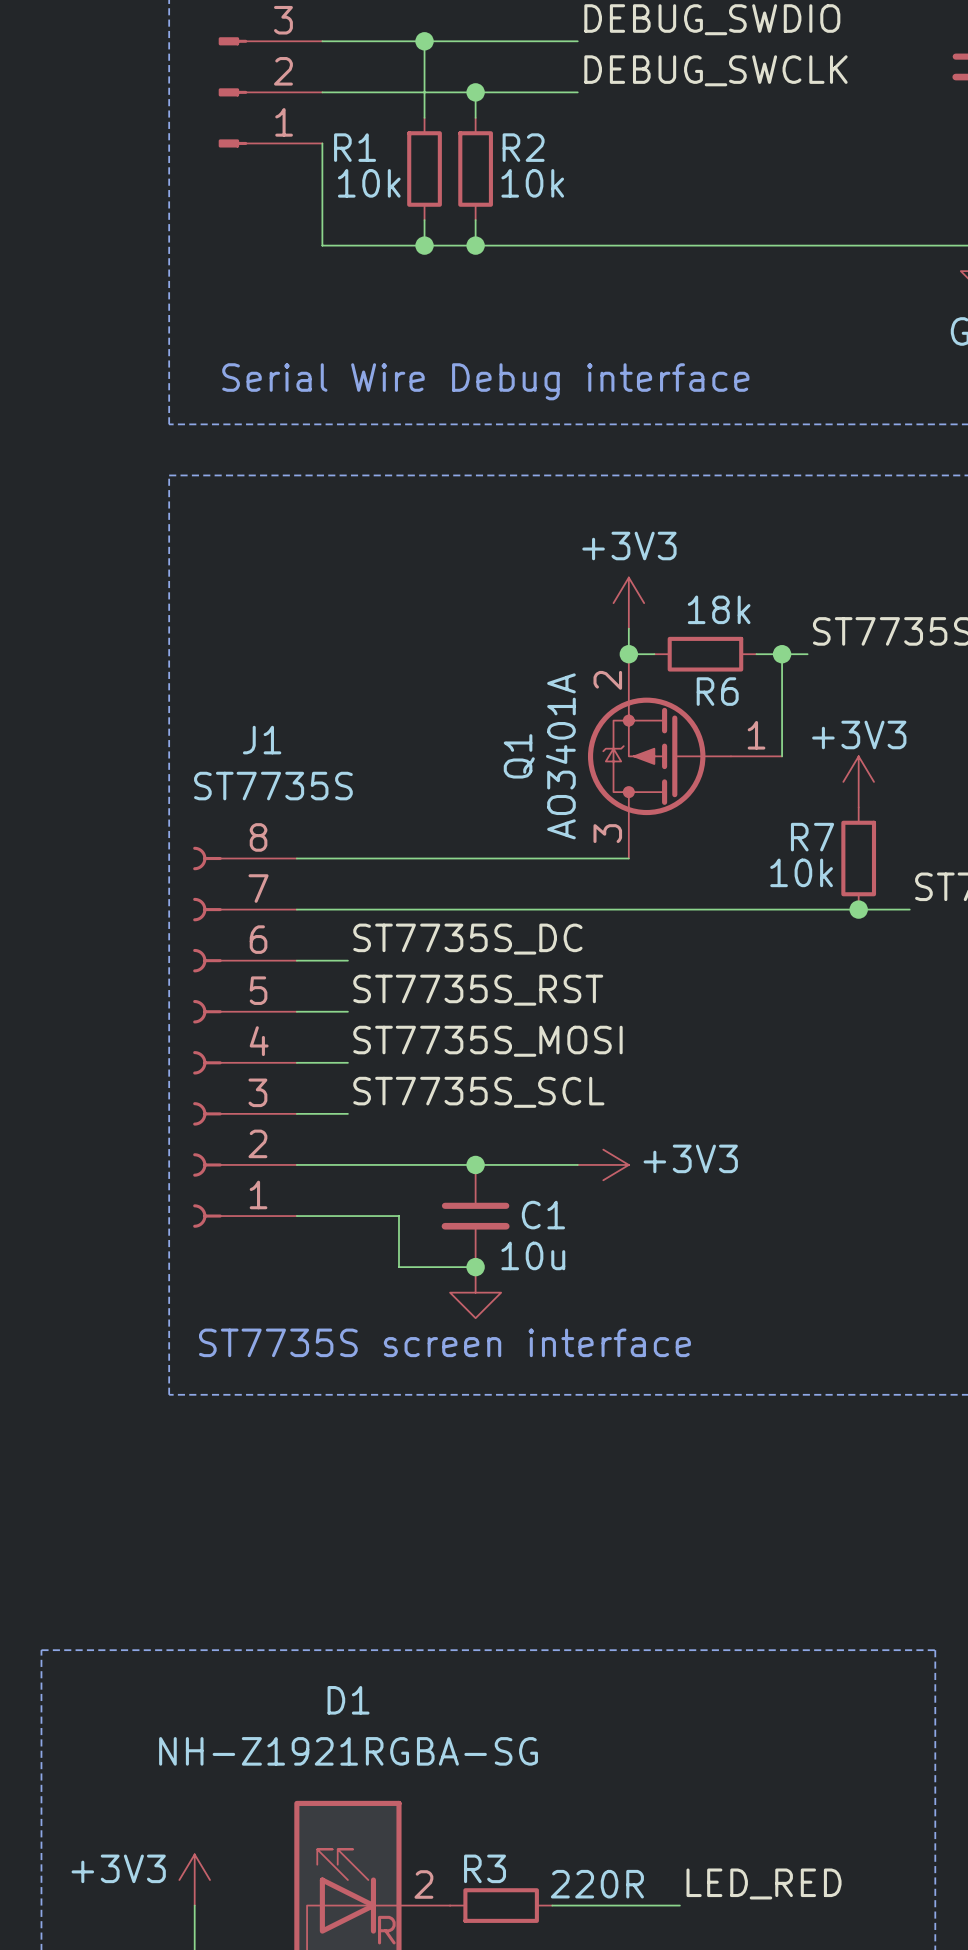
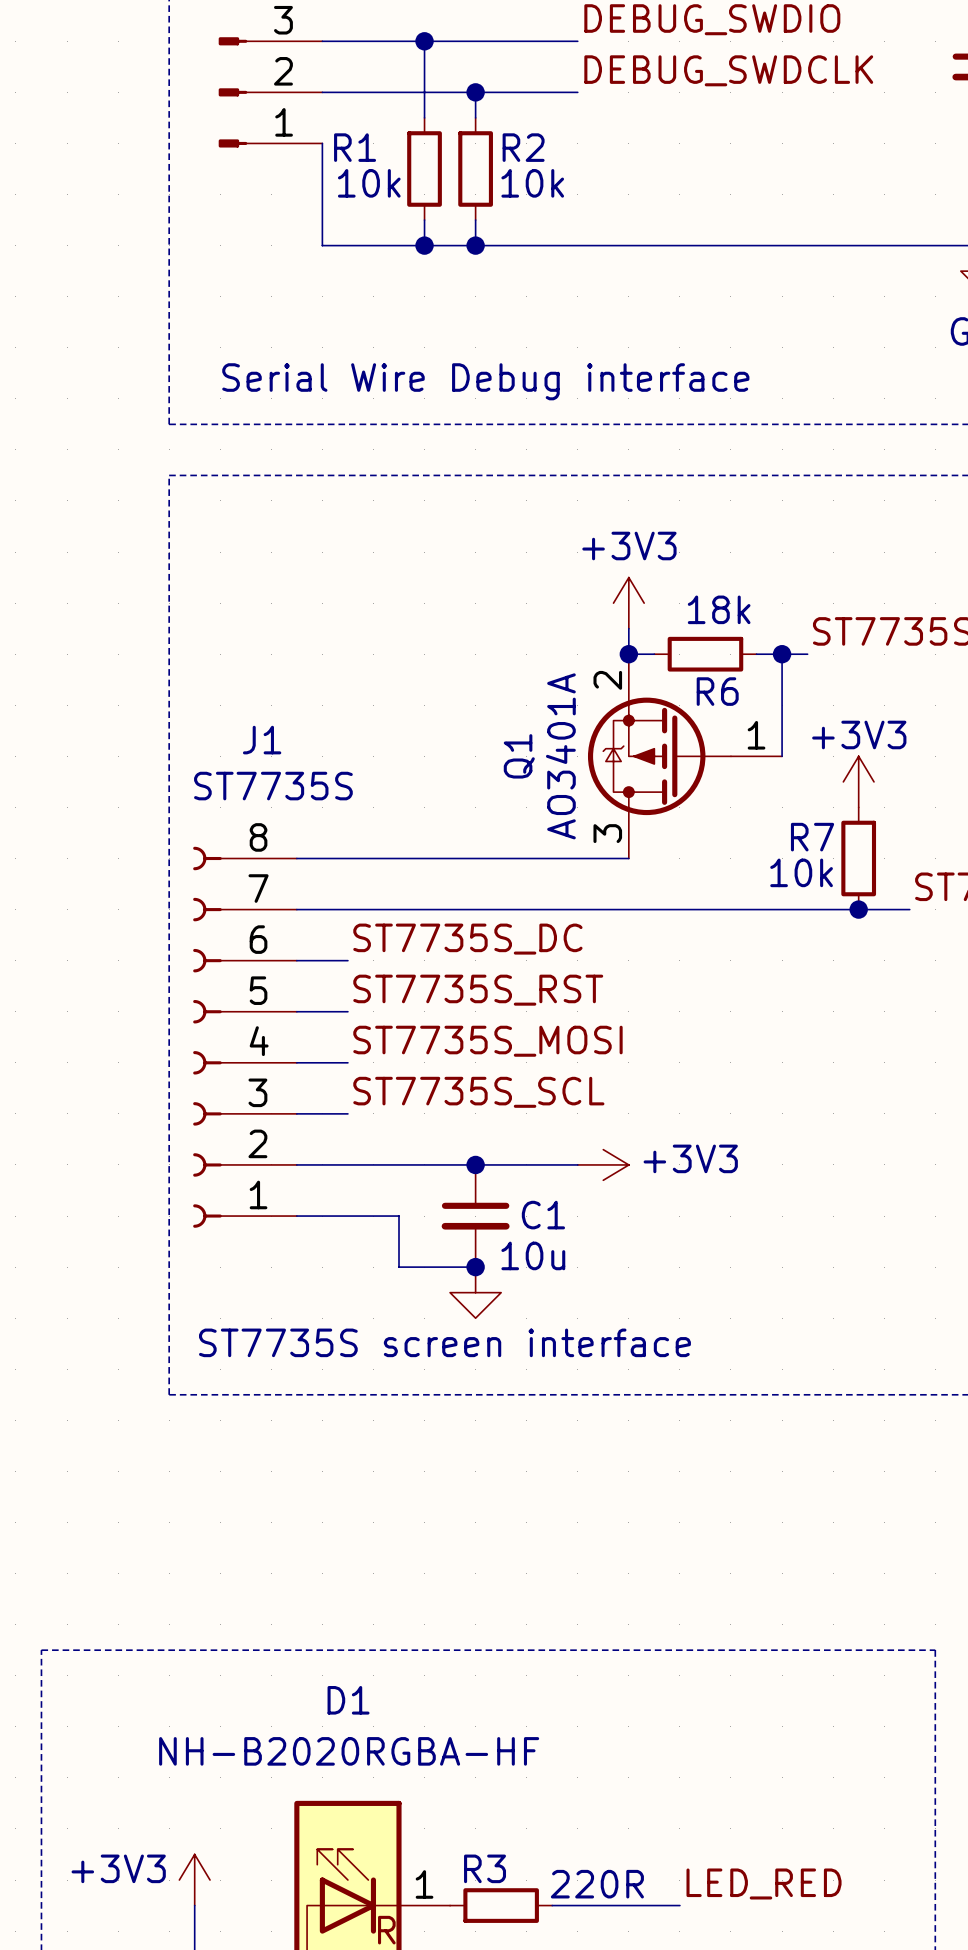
label: DEBUG_SWCLK (715, 70) -> DEBUG_SWDCLK (728, 70)
D1 value: NH-Z1921RGBA-SG (348, 1751) -> NH-B2020RGBA-HF (349, 1751)
D1 pin number: 2 (423, 1884) -> 1 (424, 1884)

